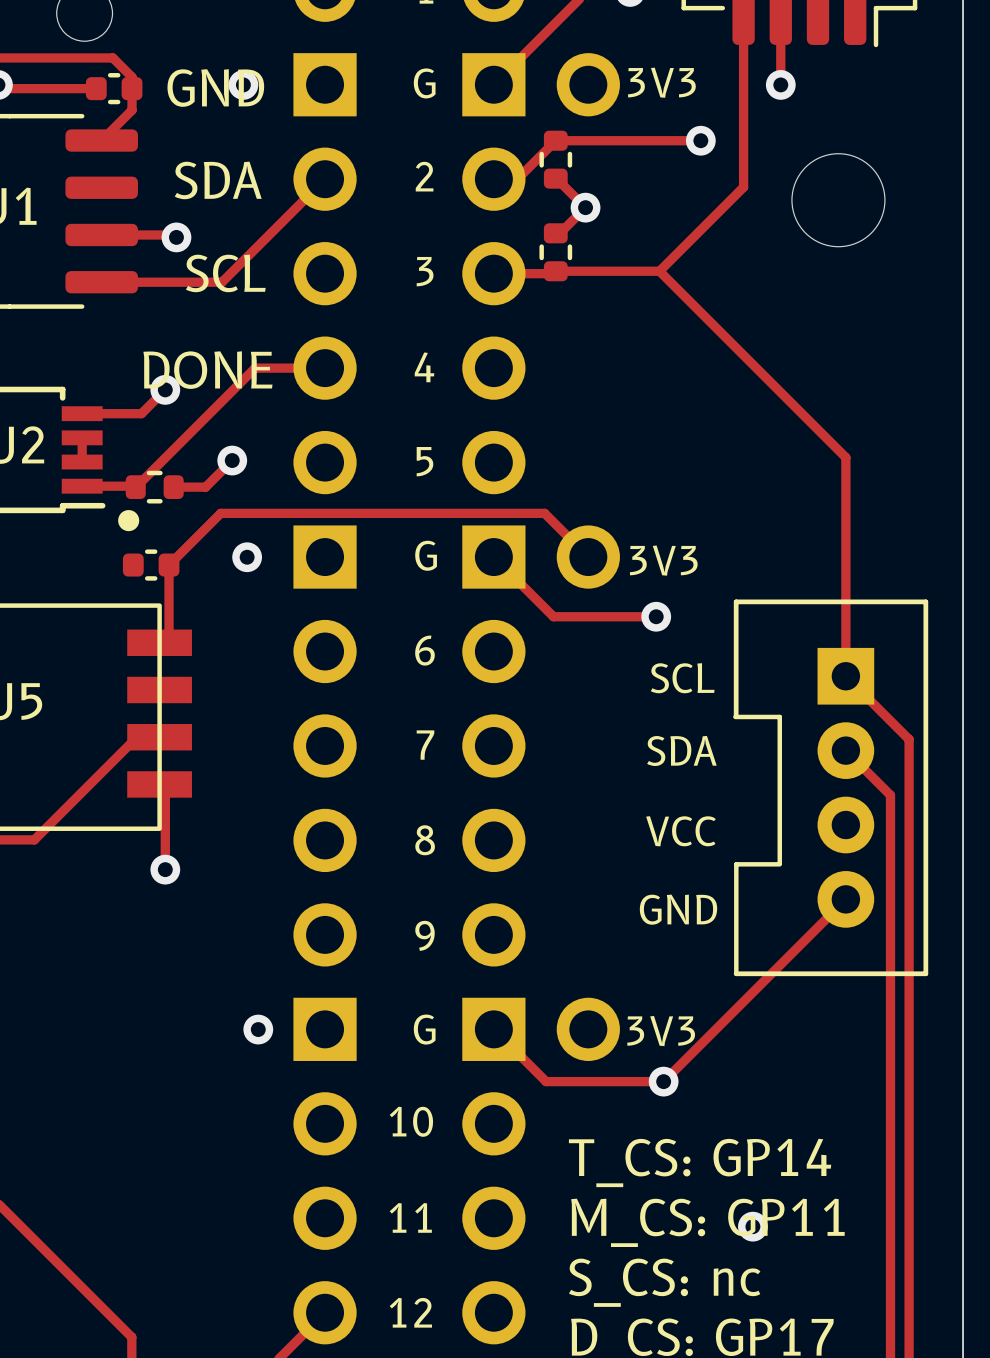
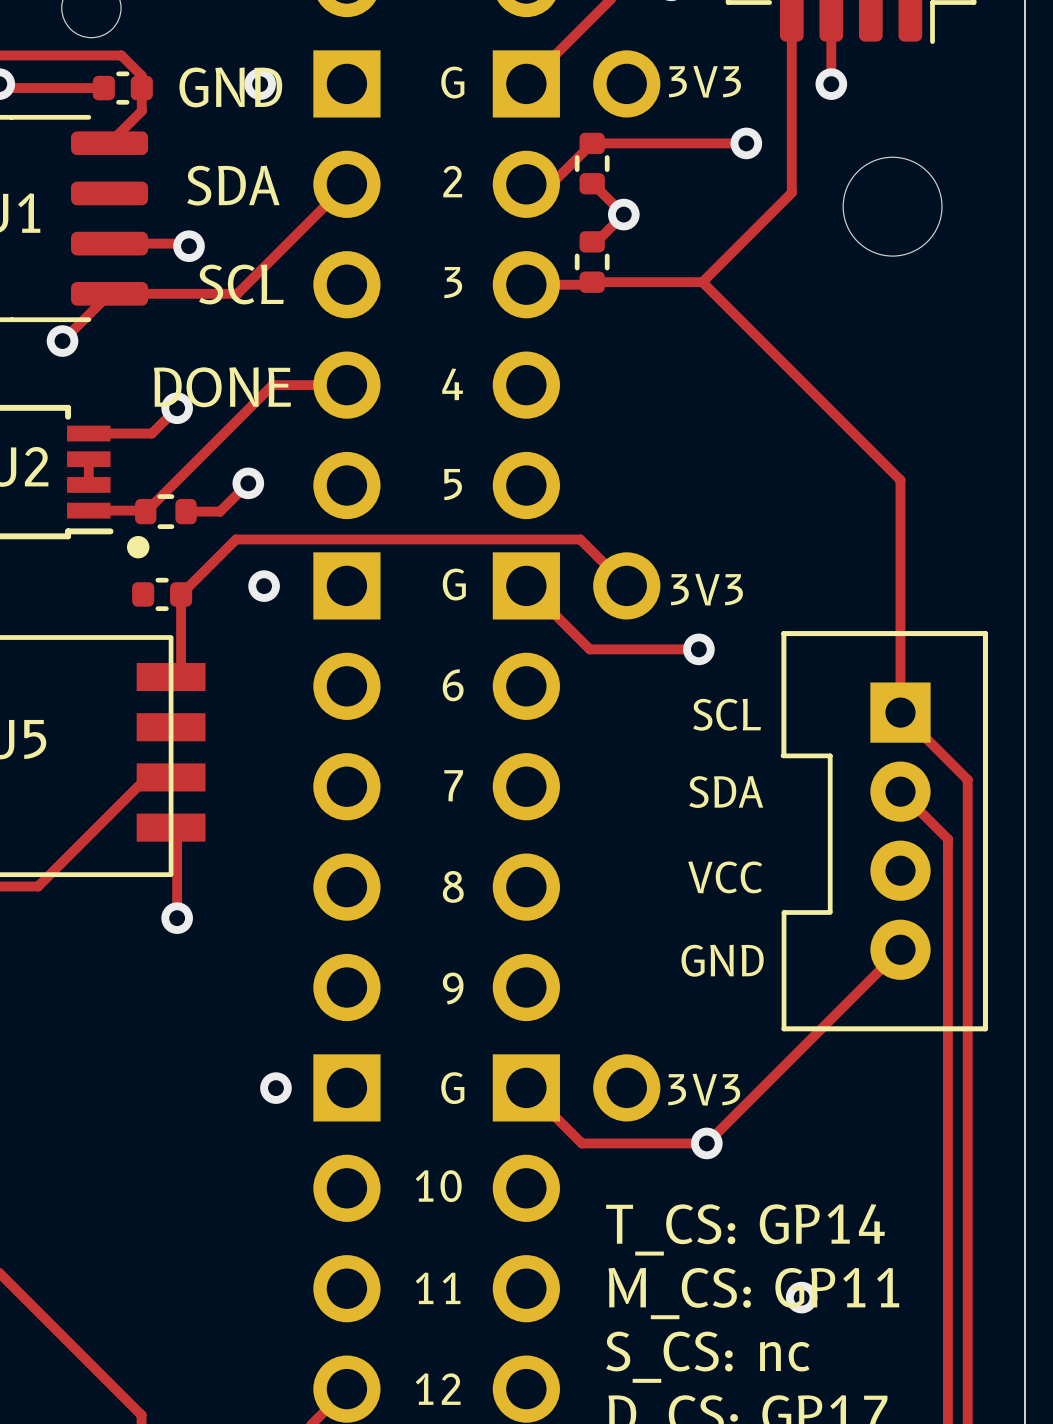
track: none -> (109, 294) (62, 341)
via: none -> (62, 341)

